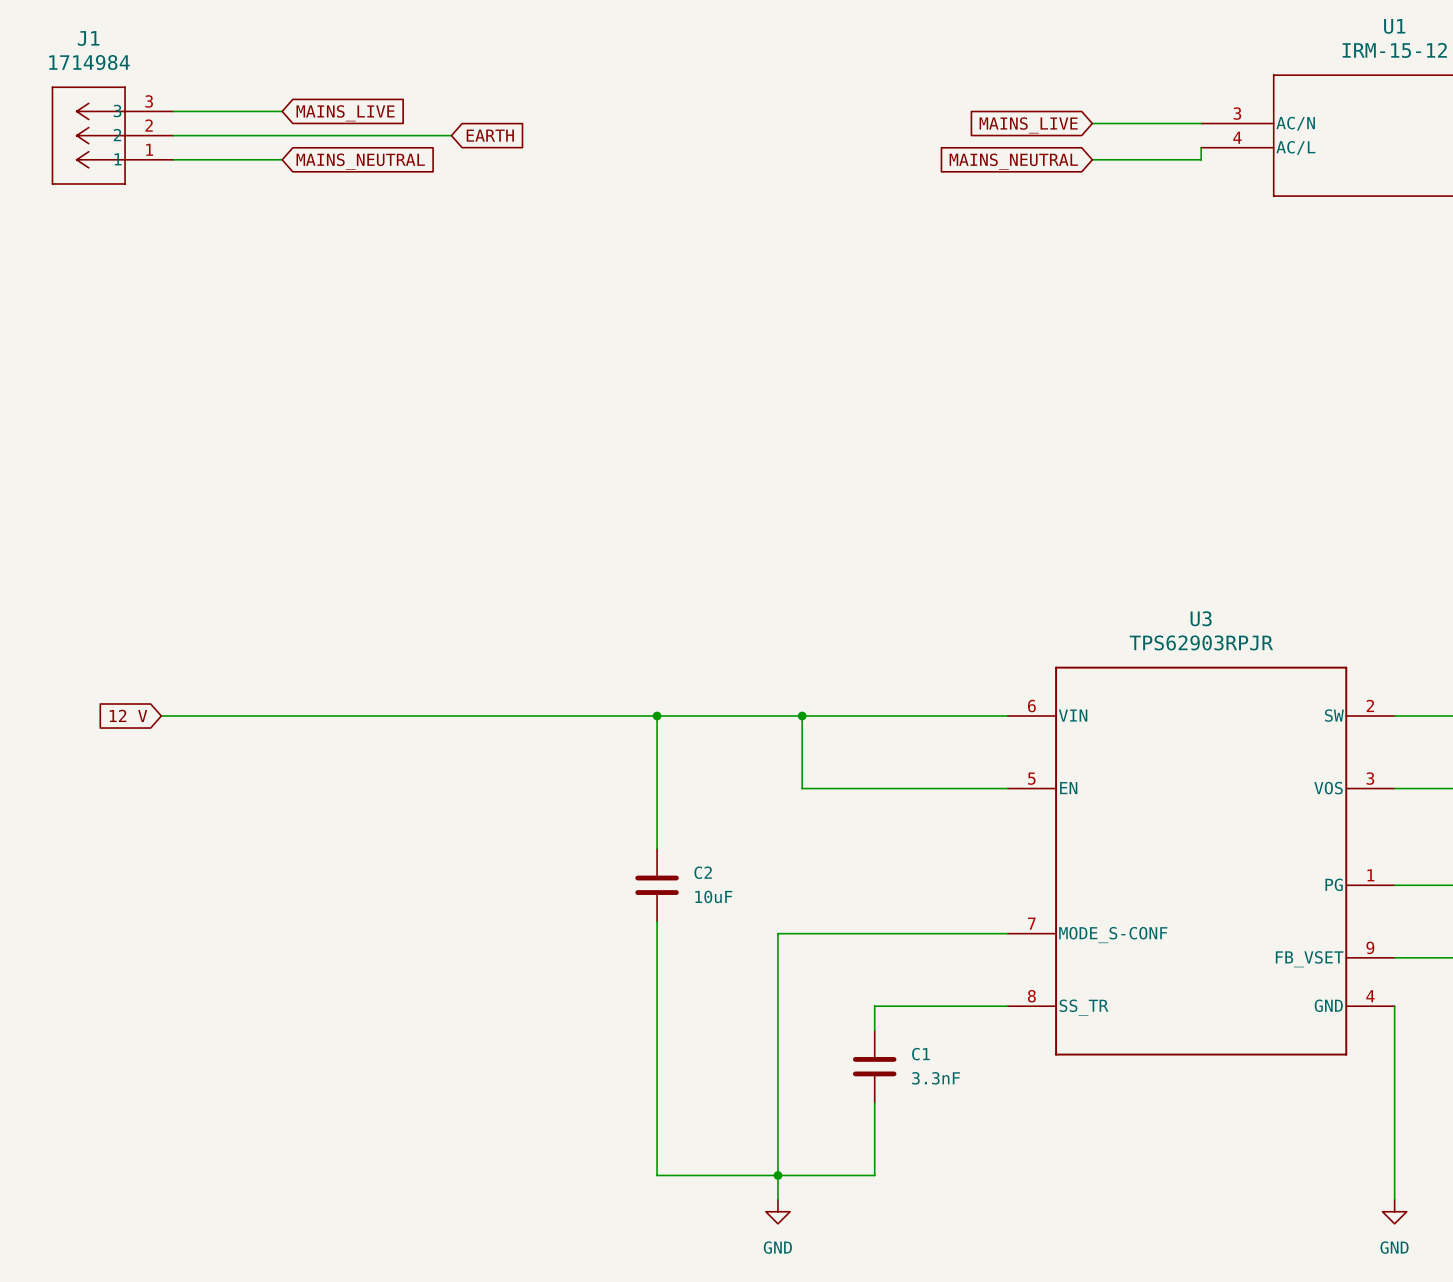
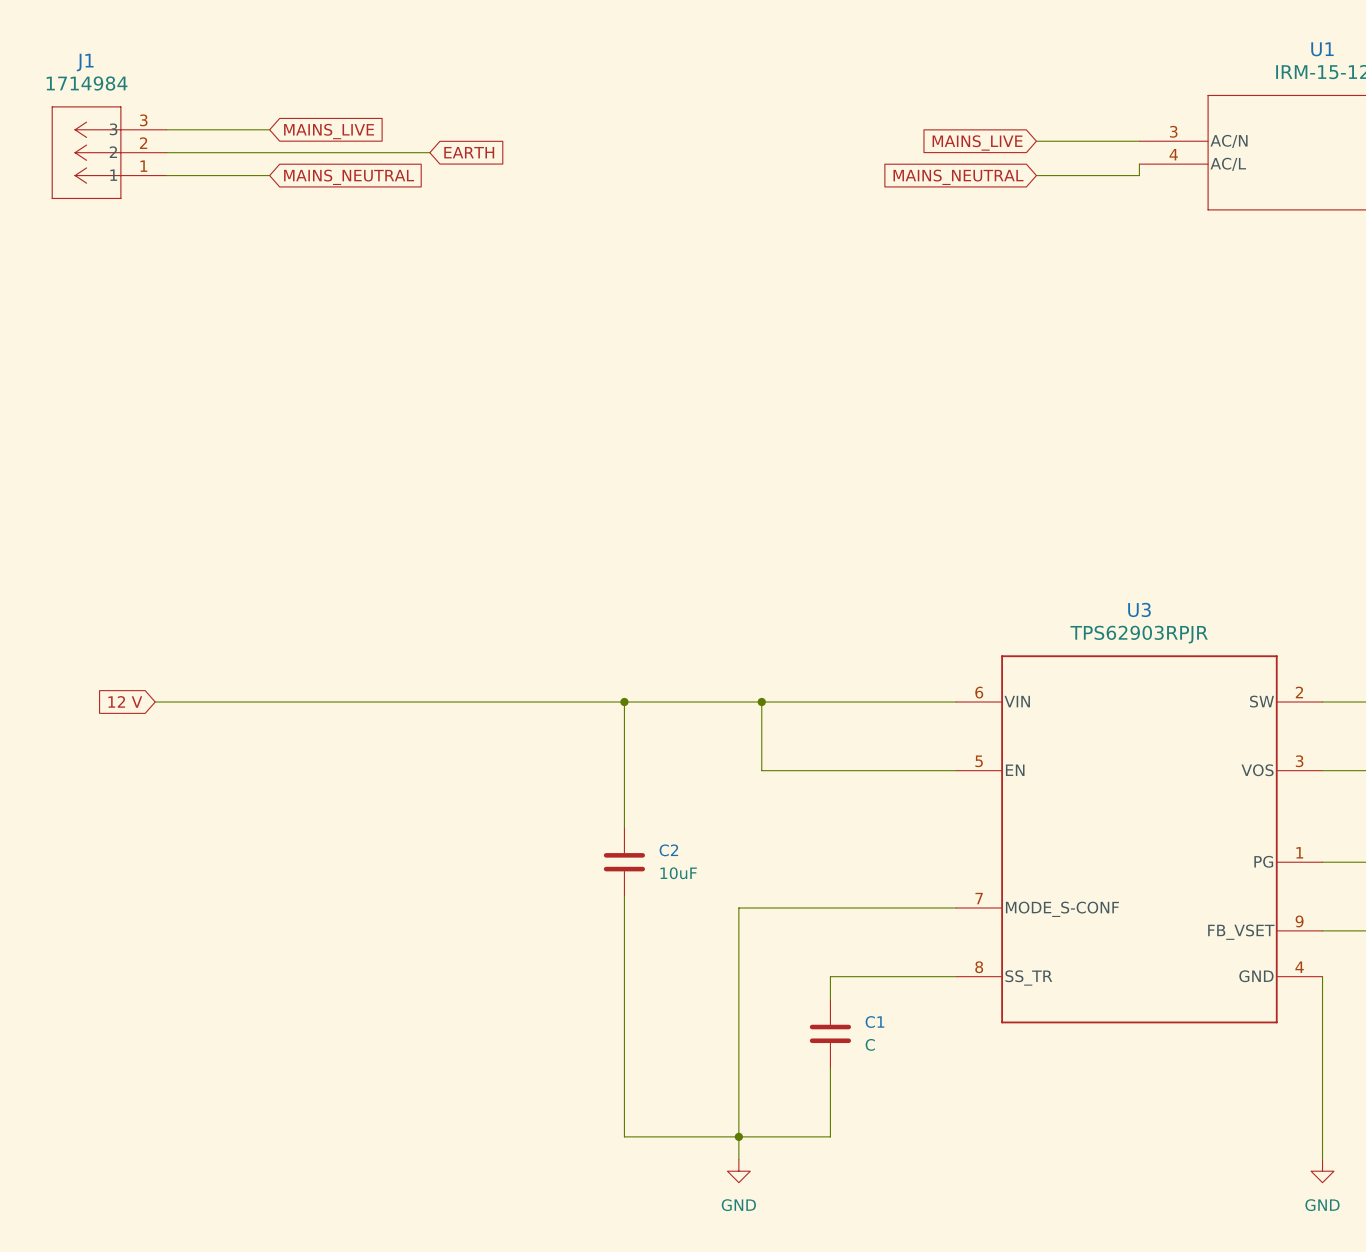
C1 value: 3.3nF (935, 1078) -> C (870, 1044)

